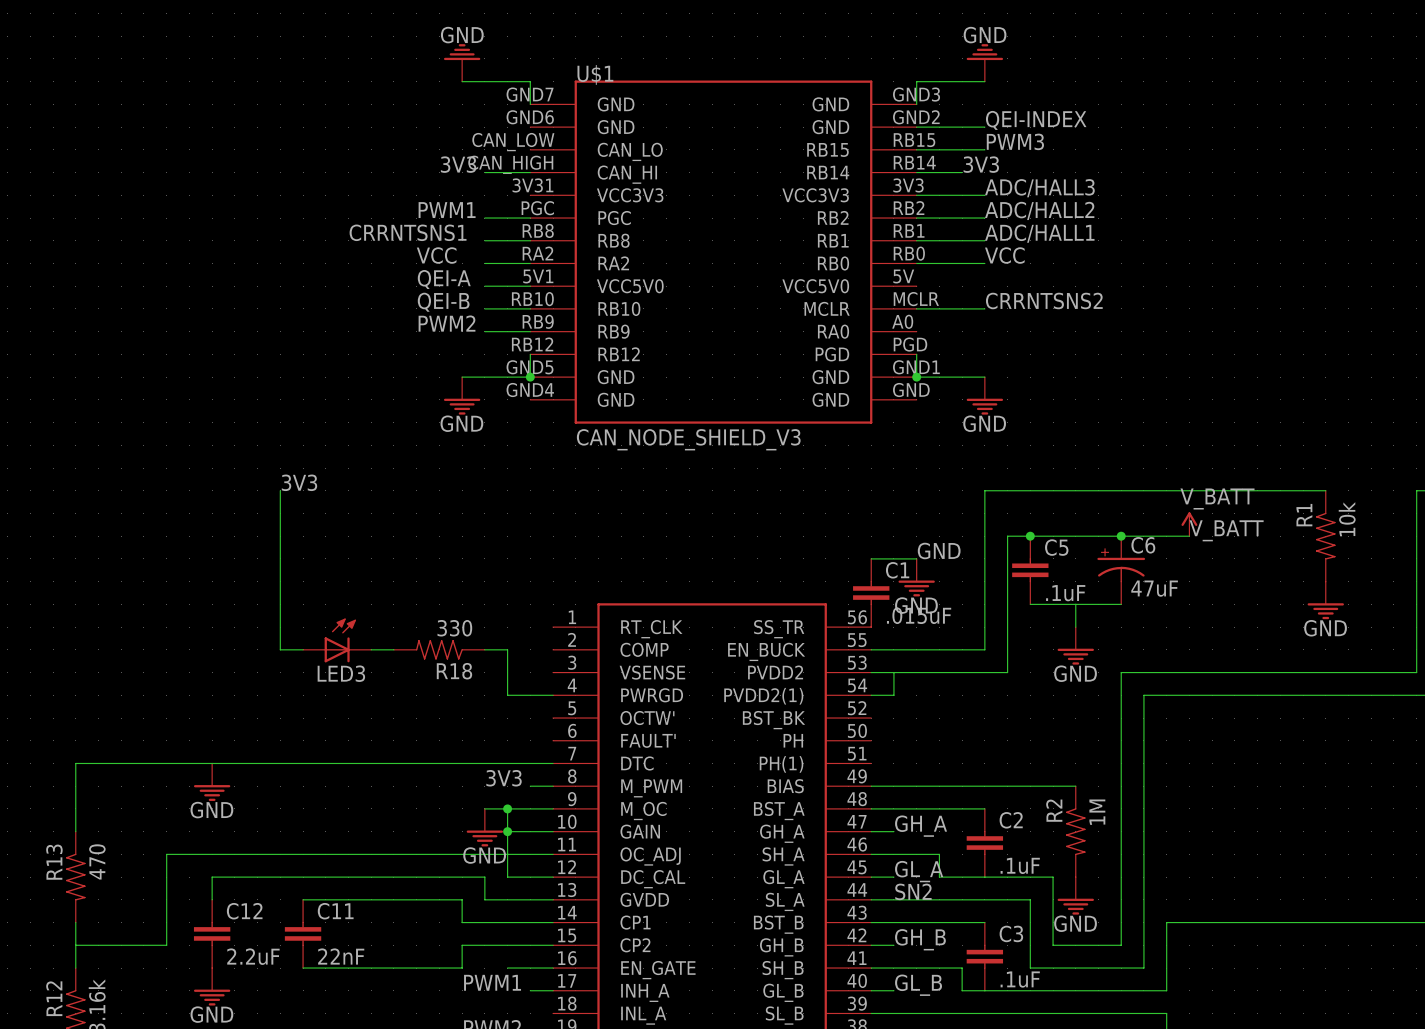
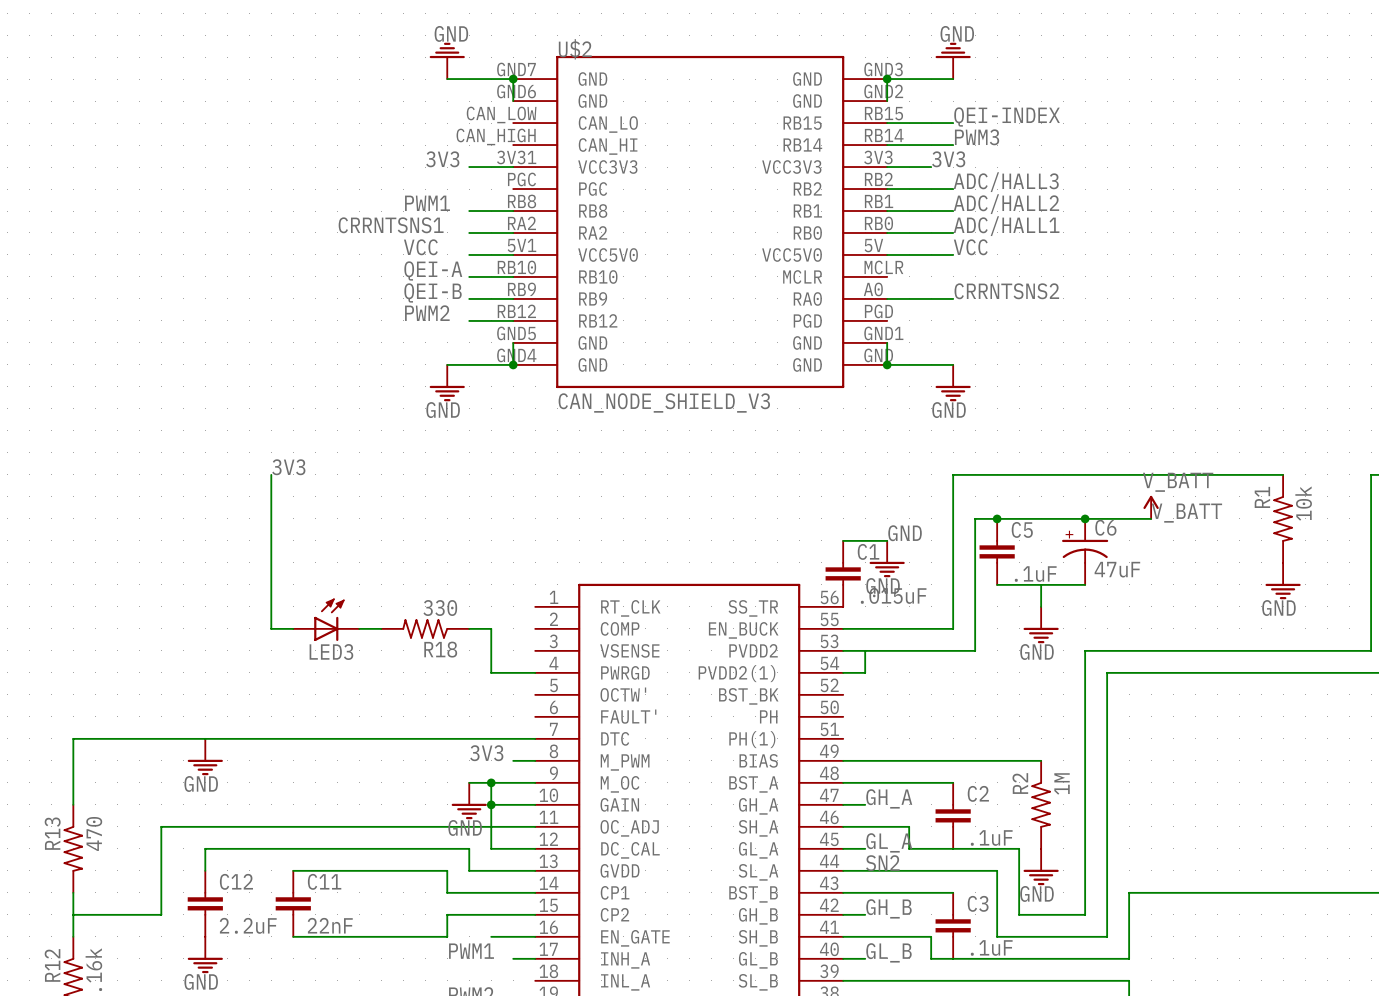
junction: none -> (513, 79)
junction: none -> (887, 79)
U$2: none -> CAN_NODE_SHIELD_V3 (700, 221)
U$1: CAN_NODE_SHIELD_V3 (723, 252) -> none

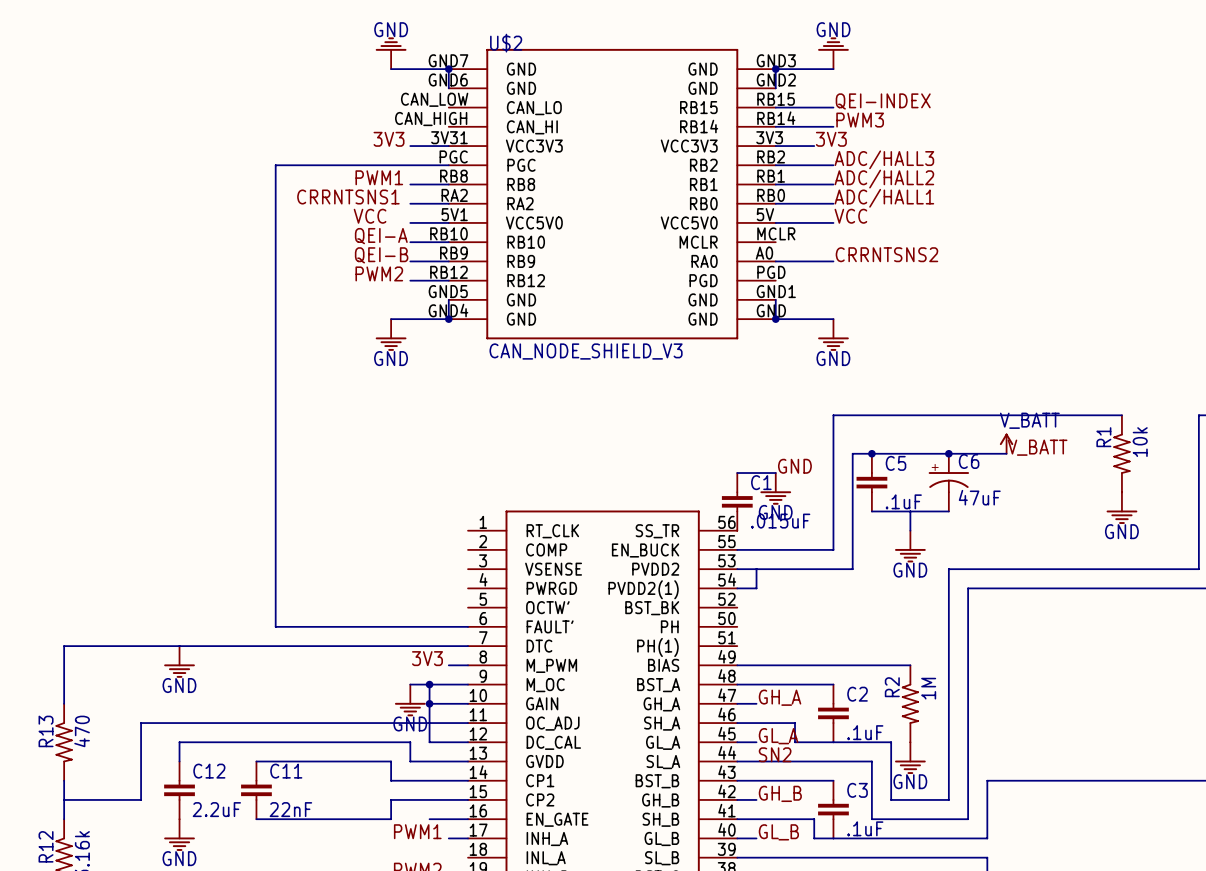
wire: none -> (448, 165) (275, 165) (275, 626) (468, 626)
label: 3V3 (288, 467) -> none
wire: (271, 474) (271, 628) (293, 628) -> none
LED3: (326, 619) -> none
wire: (359, 628) (381, 628) -> none
R18: 330 (425, 628) -> none
wire: (469, 628) (491, 628) (491, 672) (535, 672) -> none

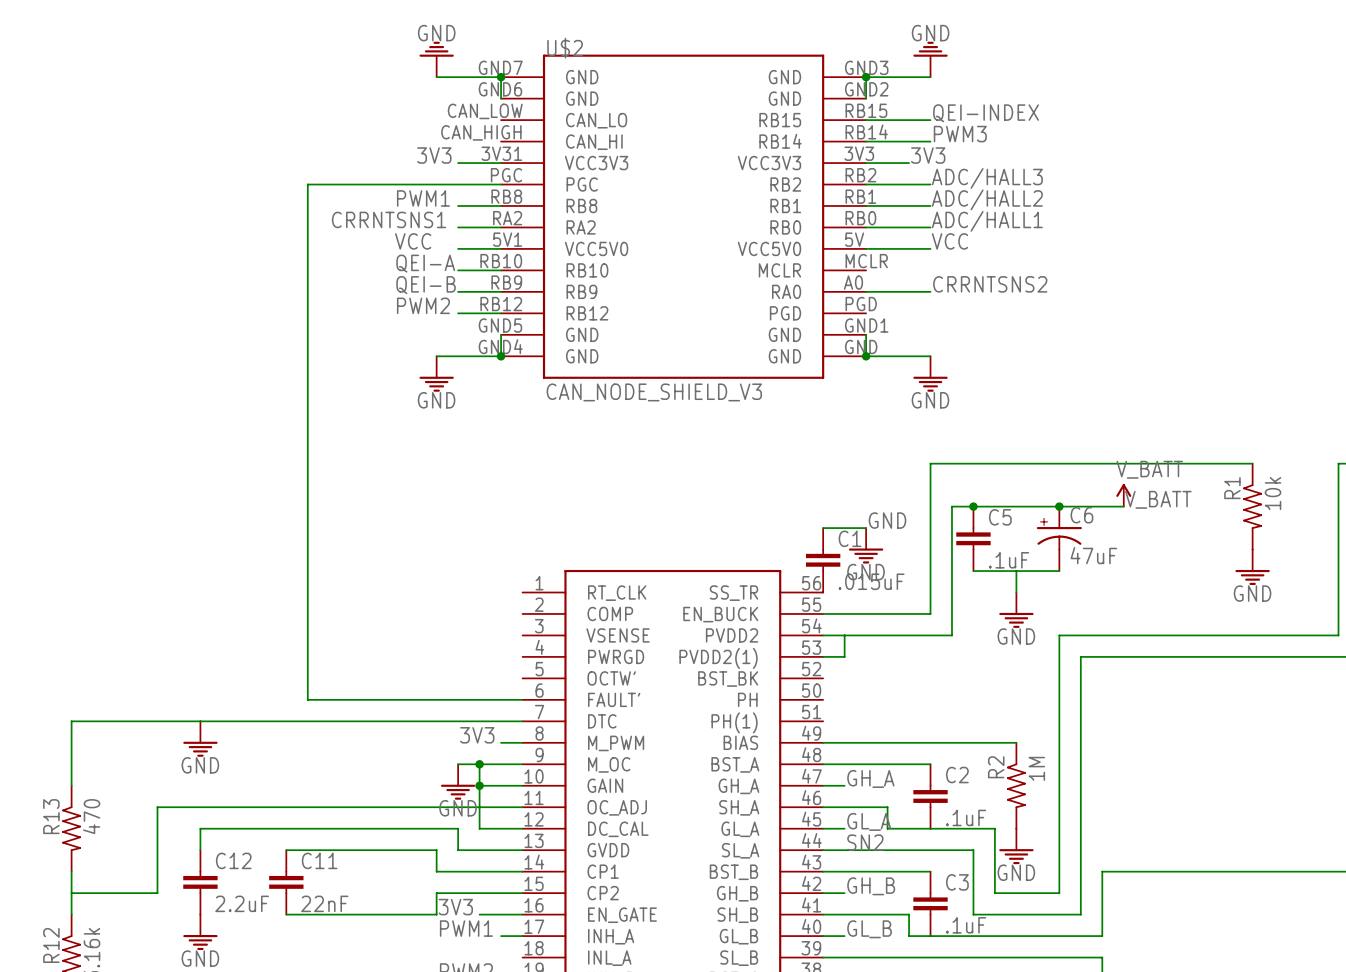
part pin number: 53 (726, 560) -> 54 (811, 625)
part pin number: 54 (727, 579) -> 53 (811, 647)
label: none -> 3V3 (455, 907)

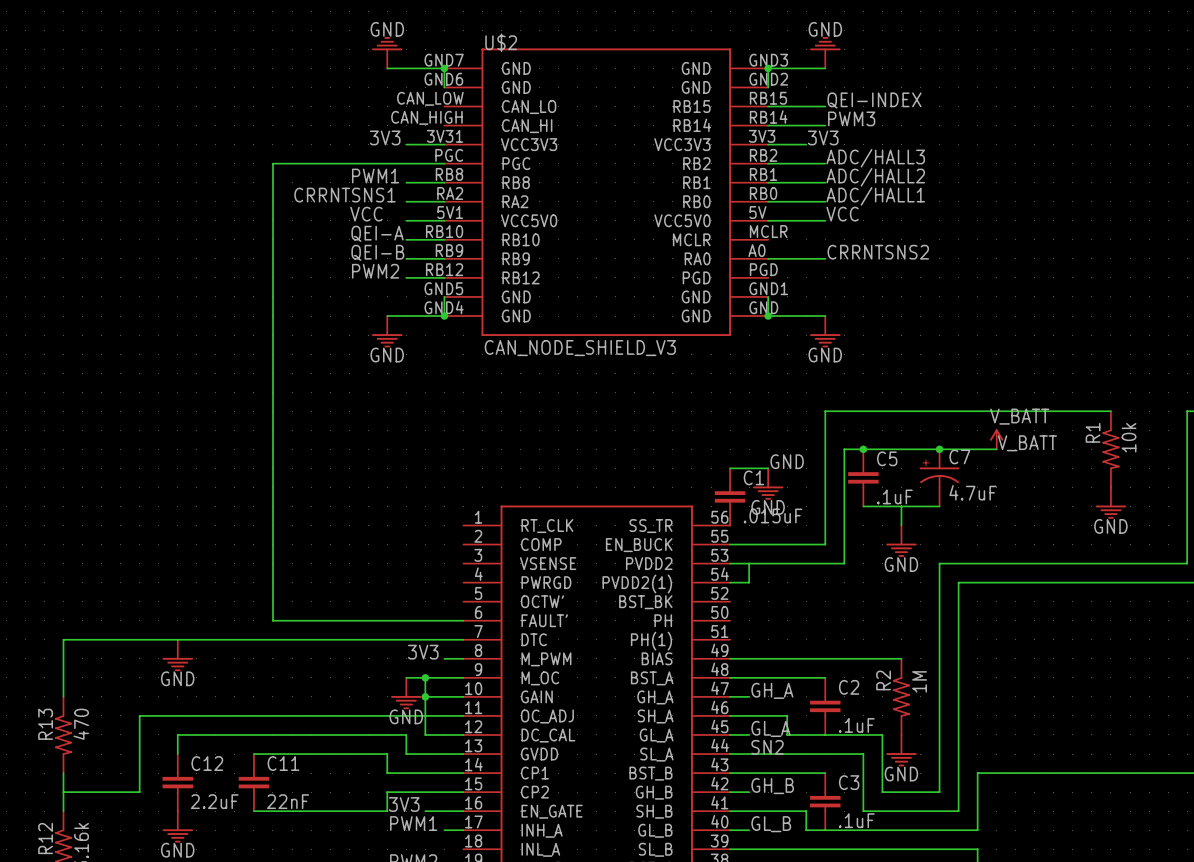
C6 name: C6 (1081, 515) -> C7 (959, 456)
C6 value: 47uF (1093, 555) -> 4.7uF (973, 492)
part pin number: 54 (811, 625) -> 53 (719, 555)
part pin number: 53 (811, 647) -> 54 (720, 574)

